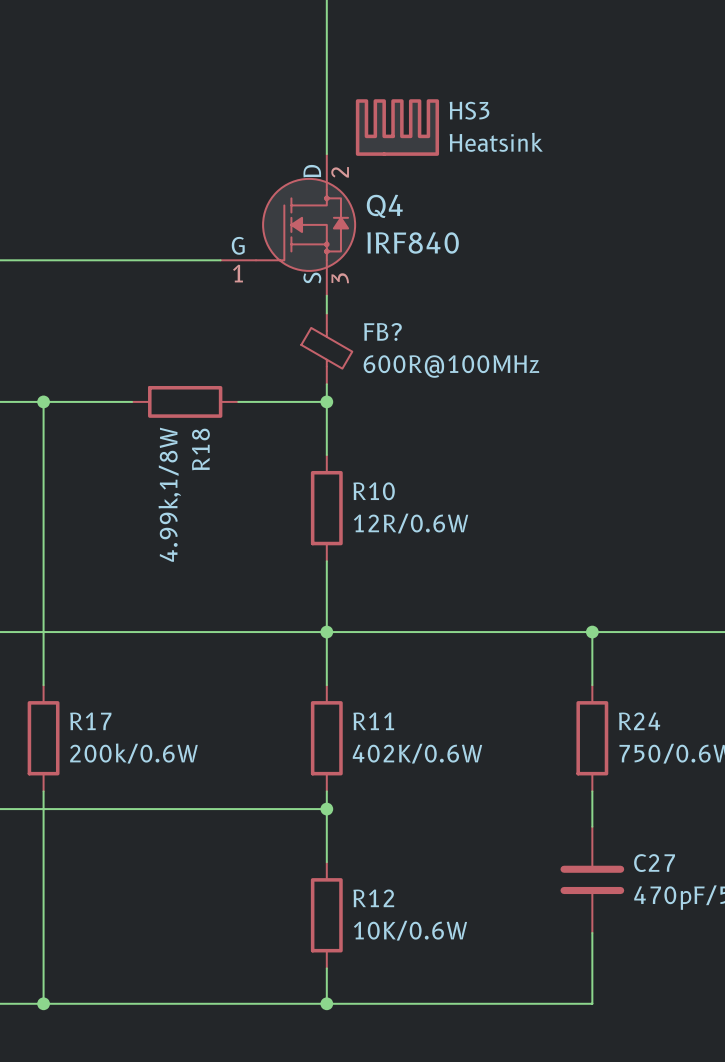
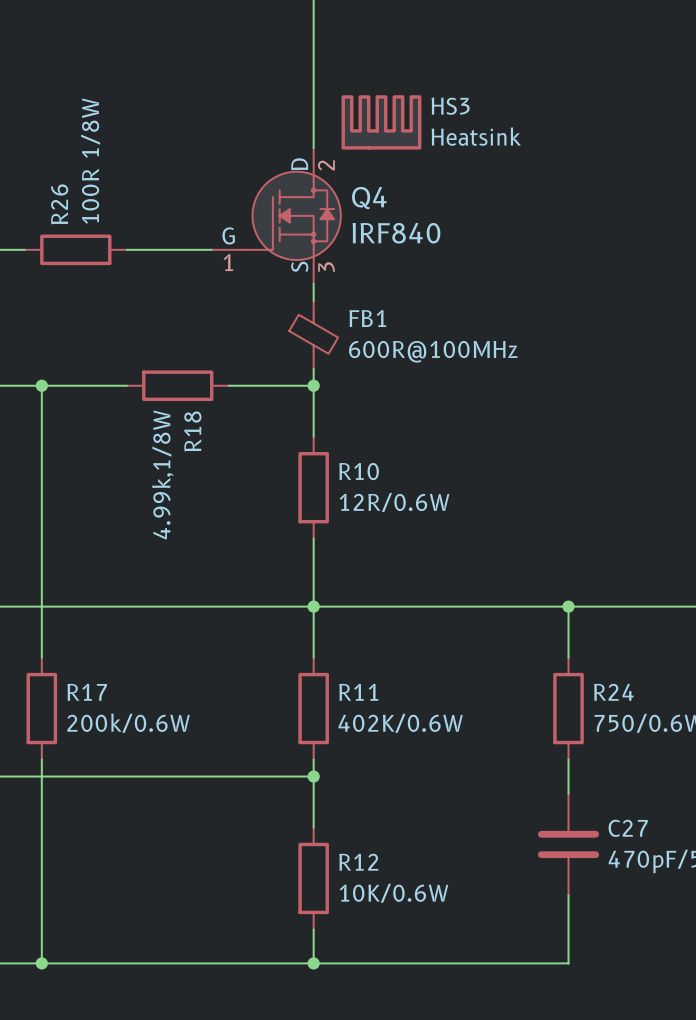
wire: (25, 260) (132, 260) -> none
R26: none -> 100R 1/8W (75, 249)
FB? name: FB? (382, 331) -> FB1 (367, 318)

